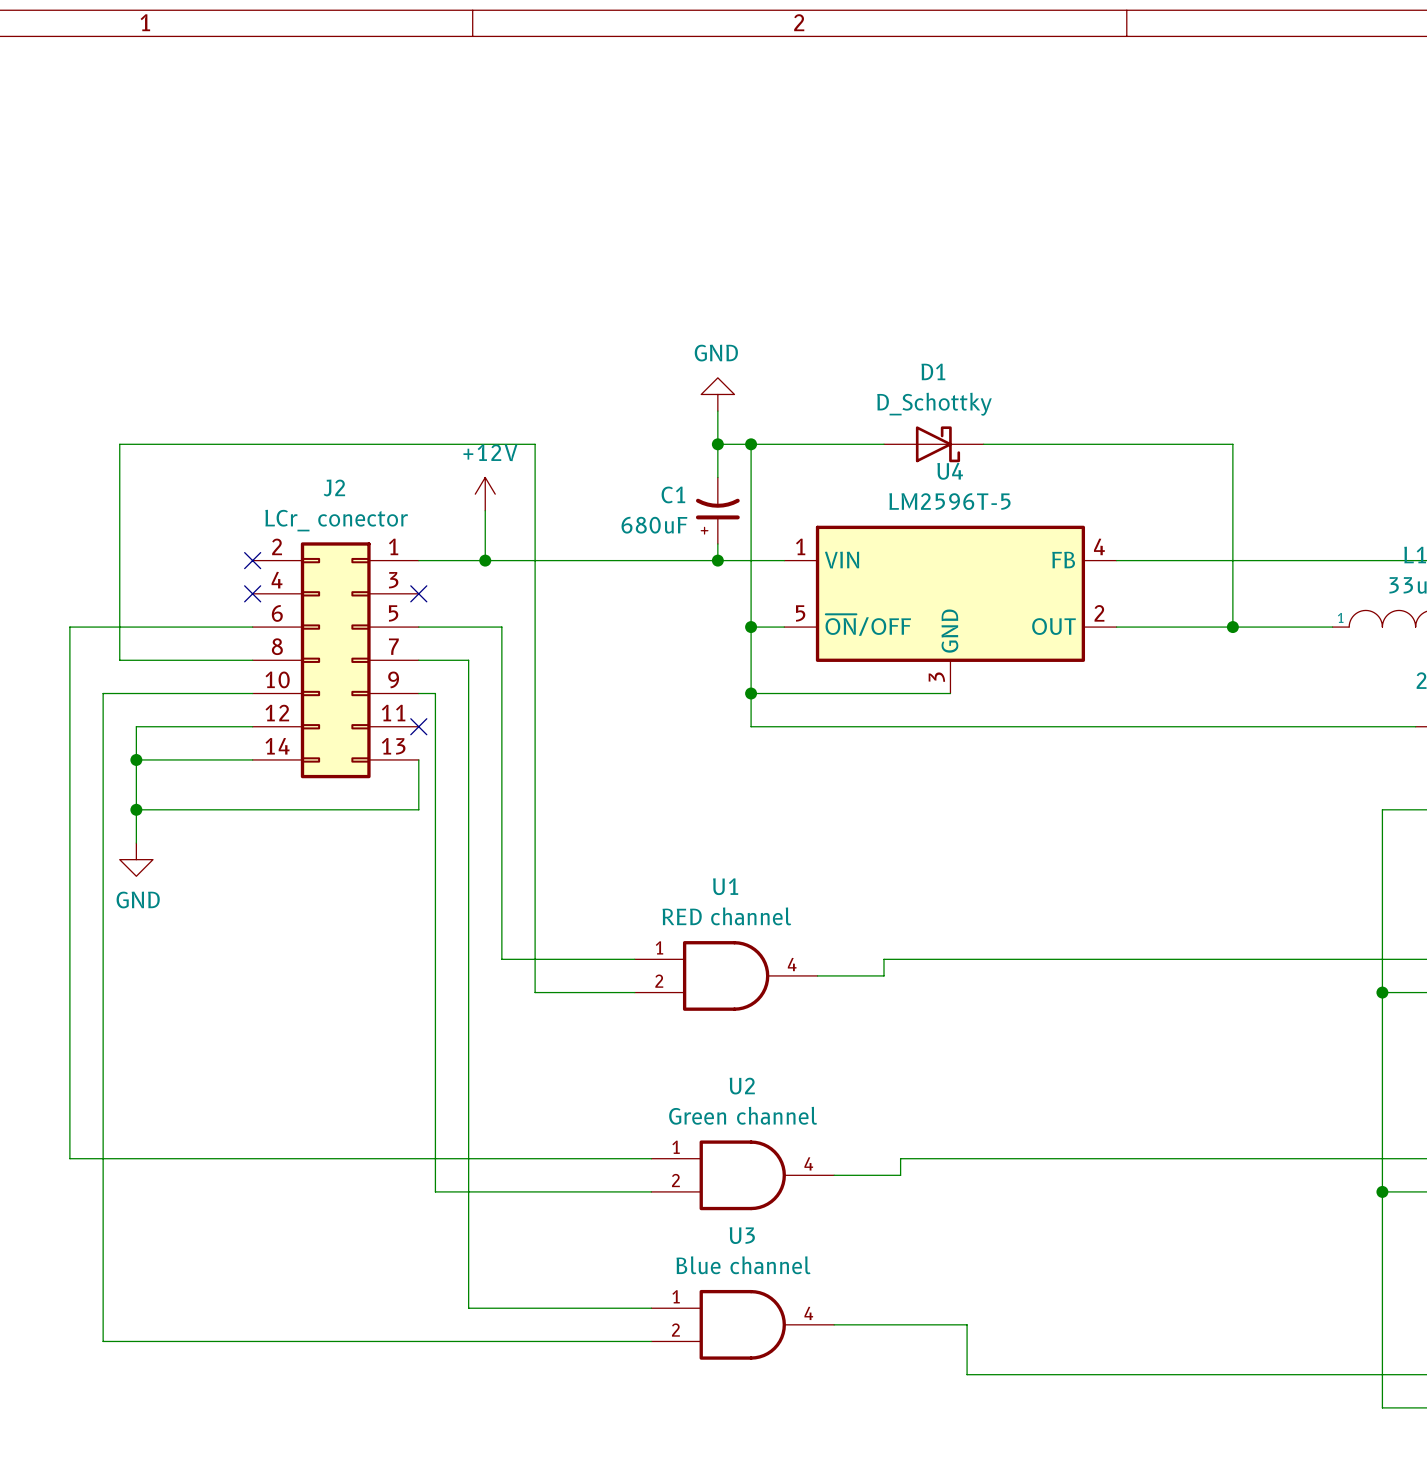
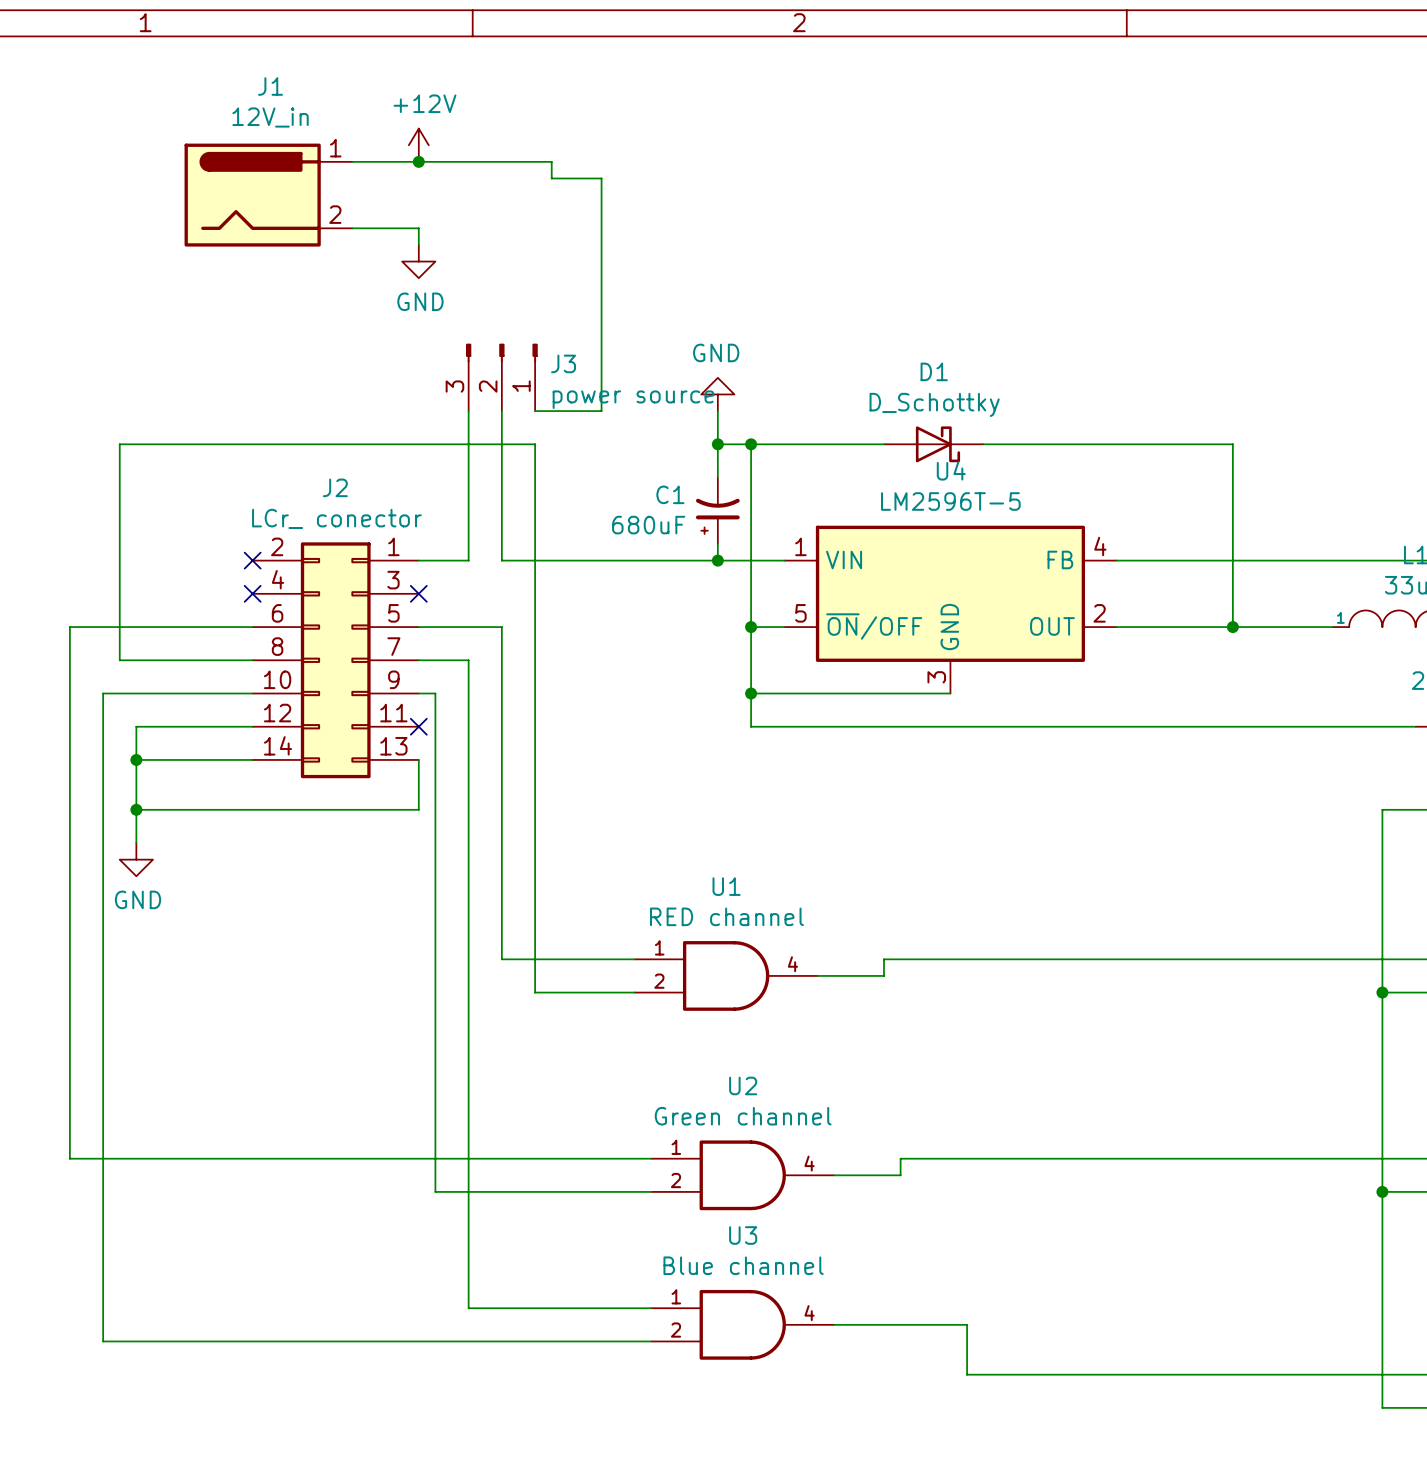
power symbol: none -> +12V (418, 145)
wire: none -> (352, 161) (551, 161) (551, 178) (601, 178) (601, 411) (535, 411)
junction: none -> (418, 161)
J1: none -> 12V_in (268, 195)
wire: none -> (352, 228) (418, 228) (418, 244)
power symbol: none -> GND (418, 261)
J3: none -> power source (501, 377)
wire: none -> (501, 411) (501, 560)
power symbol: +12V (485, 494) -> none
wire: (485, 510) (485, 560) -> none
wire: (468, 560) (501, 560) -> (468, 560) (468, 411)
junction: (485, 560) -> none

